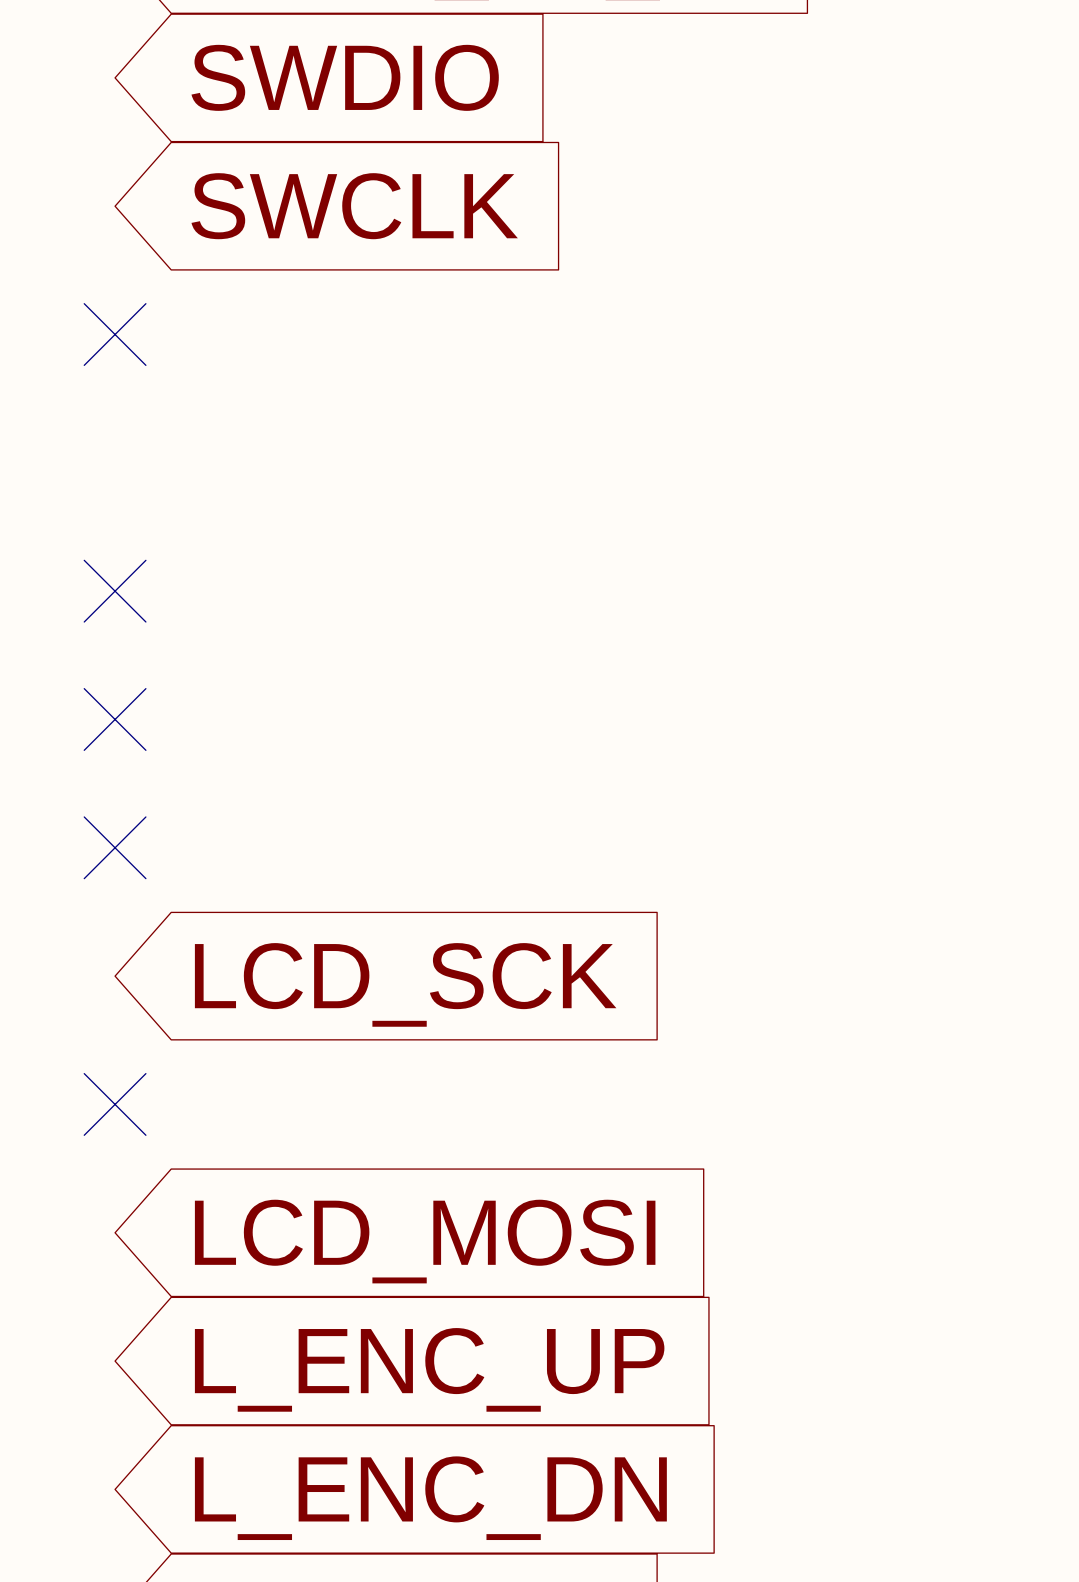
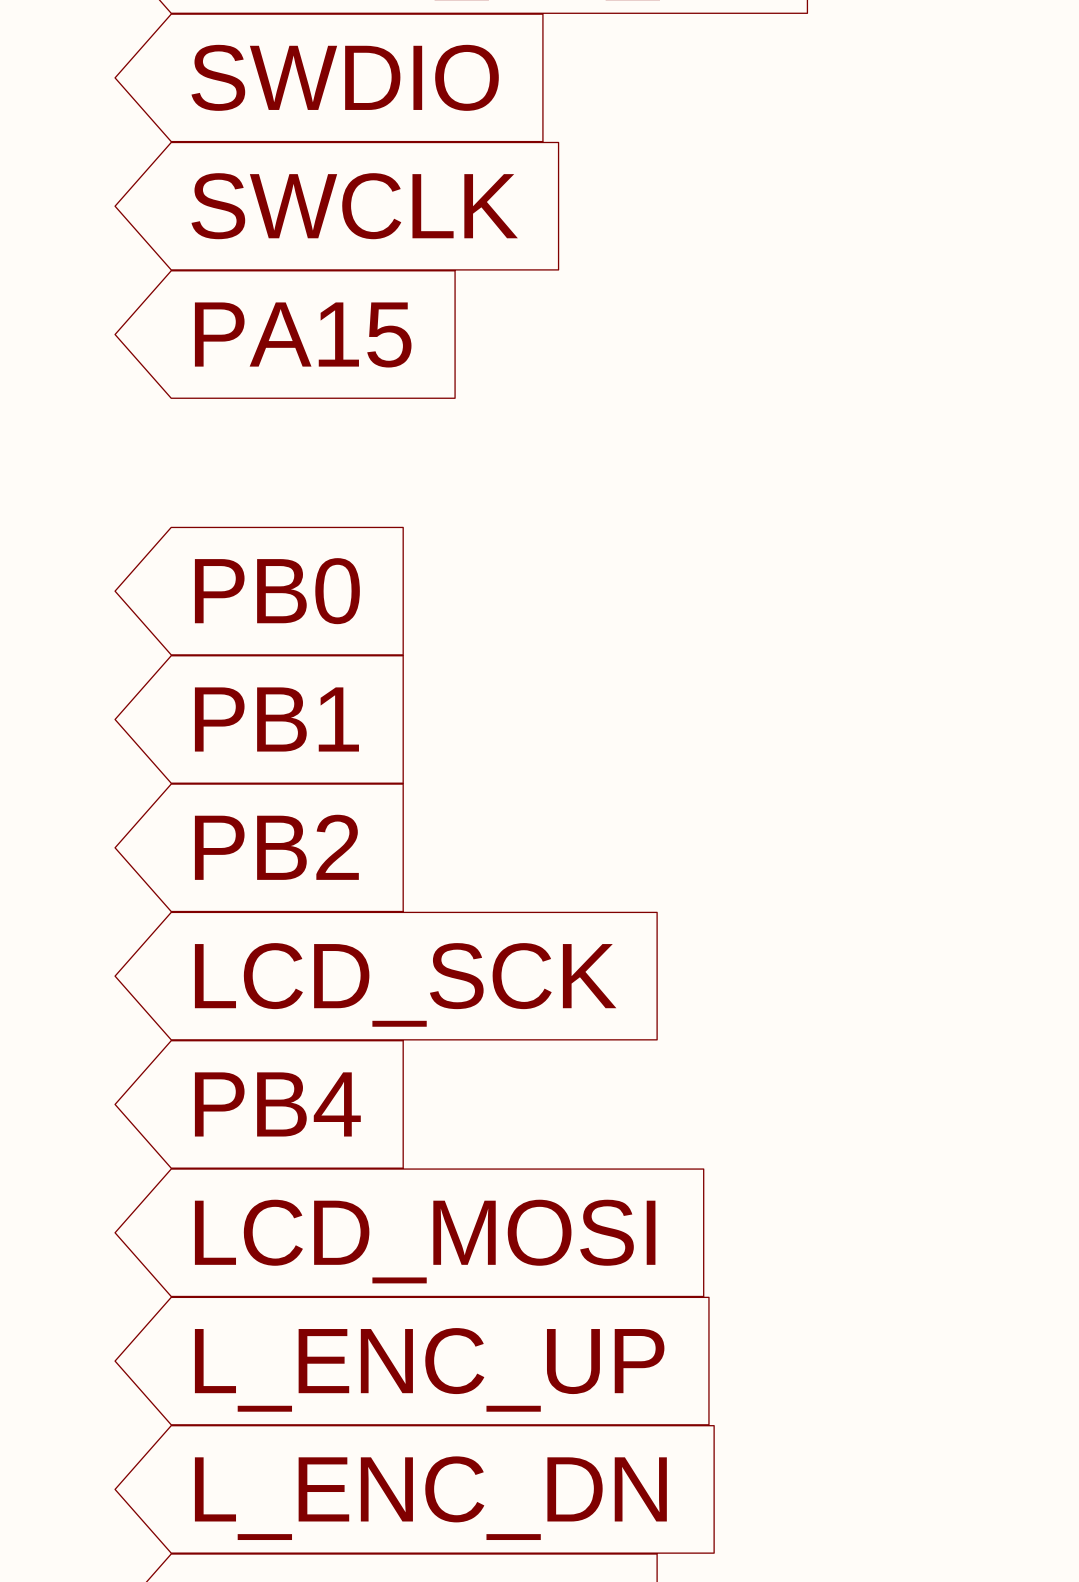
no-connect mark: (115, 334) -> none
global label: none -> PA15 (303, 334)
no-connect mark: (115, 591) -> none
global label: none -> PB0 (277, 591)
no-connect mark: (115, 719) -> none
global label: none -> PB1 (276, 719)
no-connect mark: (115, 847) -> none
global label: none -> PB2 (276, 847)
no-connect mark: (115, 1104) -> none
global label: none -> PB4 (277, 1104)

